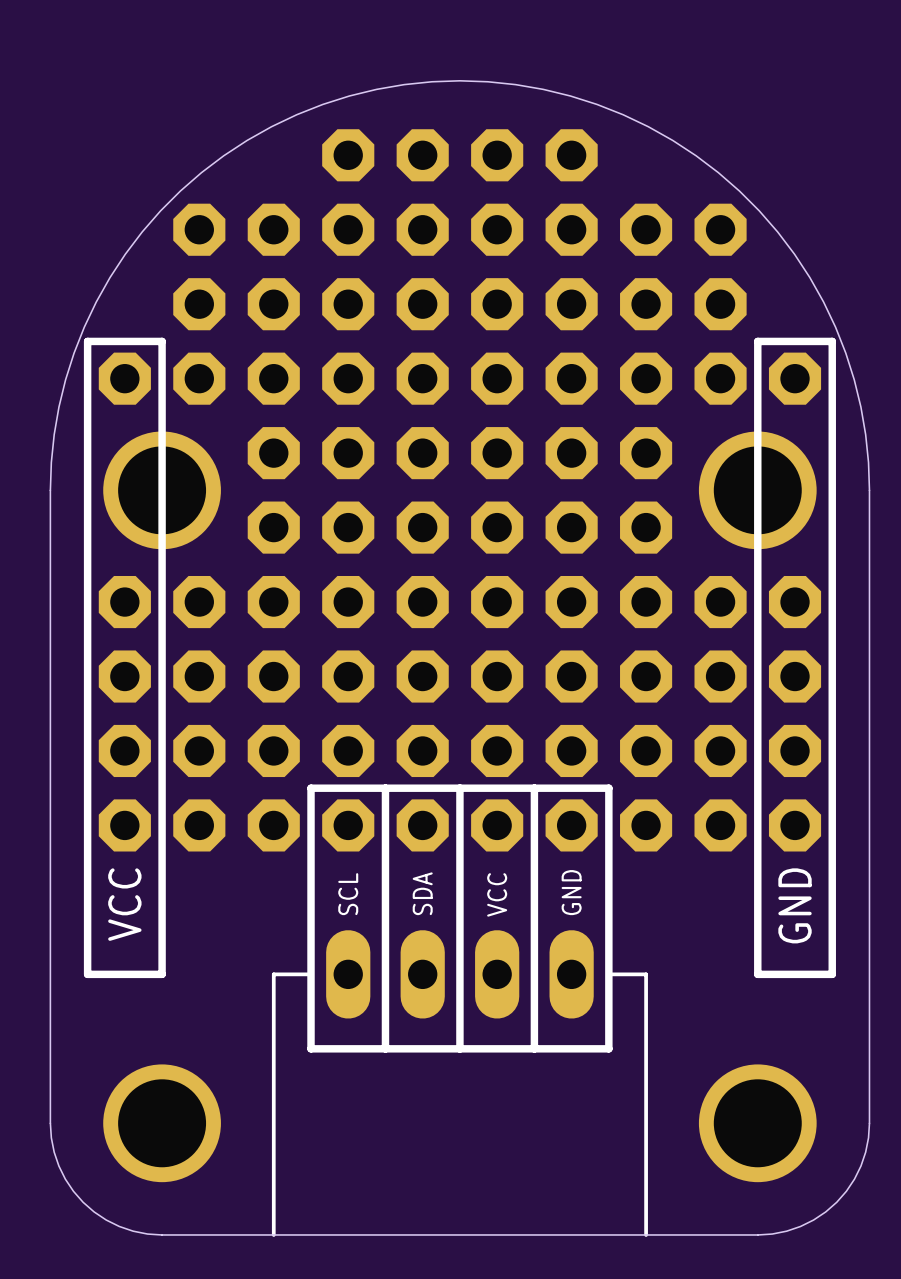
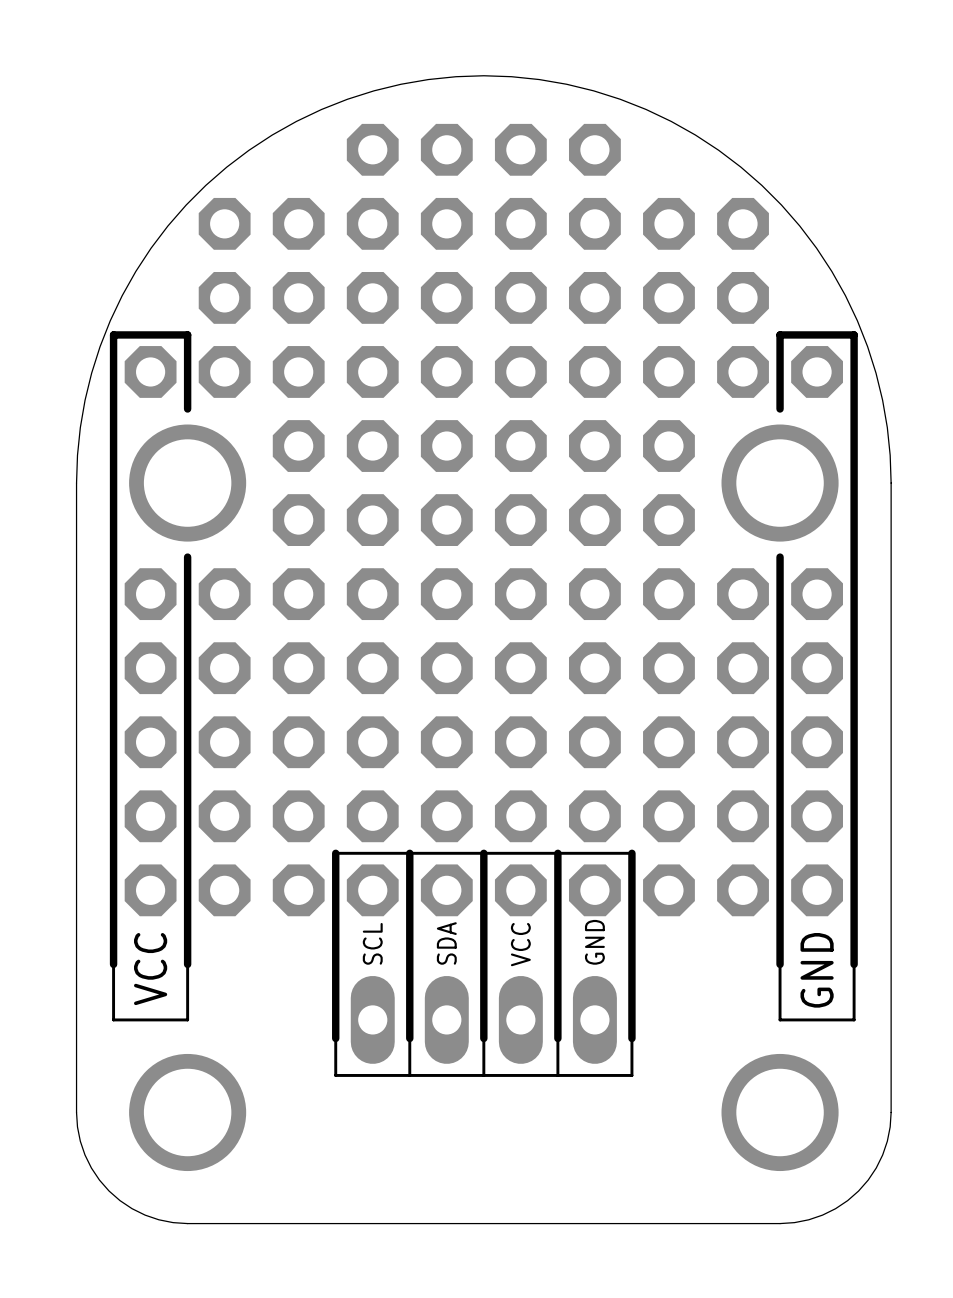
part footprint: [50, 80, 870, 1237] -> [76, 75, 892, 1224]
line: (162, 415) (162, 564) -> none
line: (757, 415) (757, 564) -> none
line: (385, 788) (385, 862) -> none
line: (459, 788) (459, 862) -> none
line: (534, 788) (534, 862) -> none
line: (311, 862) (311, 788) (608, 788) (608, 862) -> (335, 853) (631, 853)
part: none -> (150, 890)
part: none -> (372, 890)
part: none -> (446, 890)
part: none -> (520, 890)
part: none -> (594, 890)
part: none -> (817, 890)
text position: VCC (124, 904) -> VCC (150, 969)
text position: GND (795, 905) -> GND (817, 970)
line: (87, 974) (162, 974) -> (113, 964) (113, 1019) (187, 1019) (187, 964)
line: (757, 974) (832, 974) -> (780, 964) (780, 1019) (854, 1019) (854, 964)
line: (311, 1048) (608, 1048) -> (335, 1038) (335, 1075) (631, 1075) (631, 1038)
line: none -> (409, 1038) (409, 1075)
line: none -> (483, 1038) (483, 1075)
line: none -> (557, 1038) (557, 1075)

